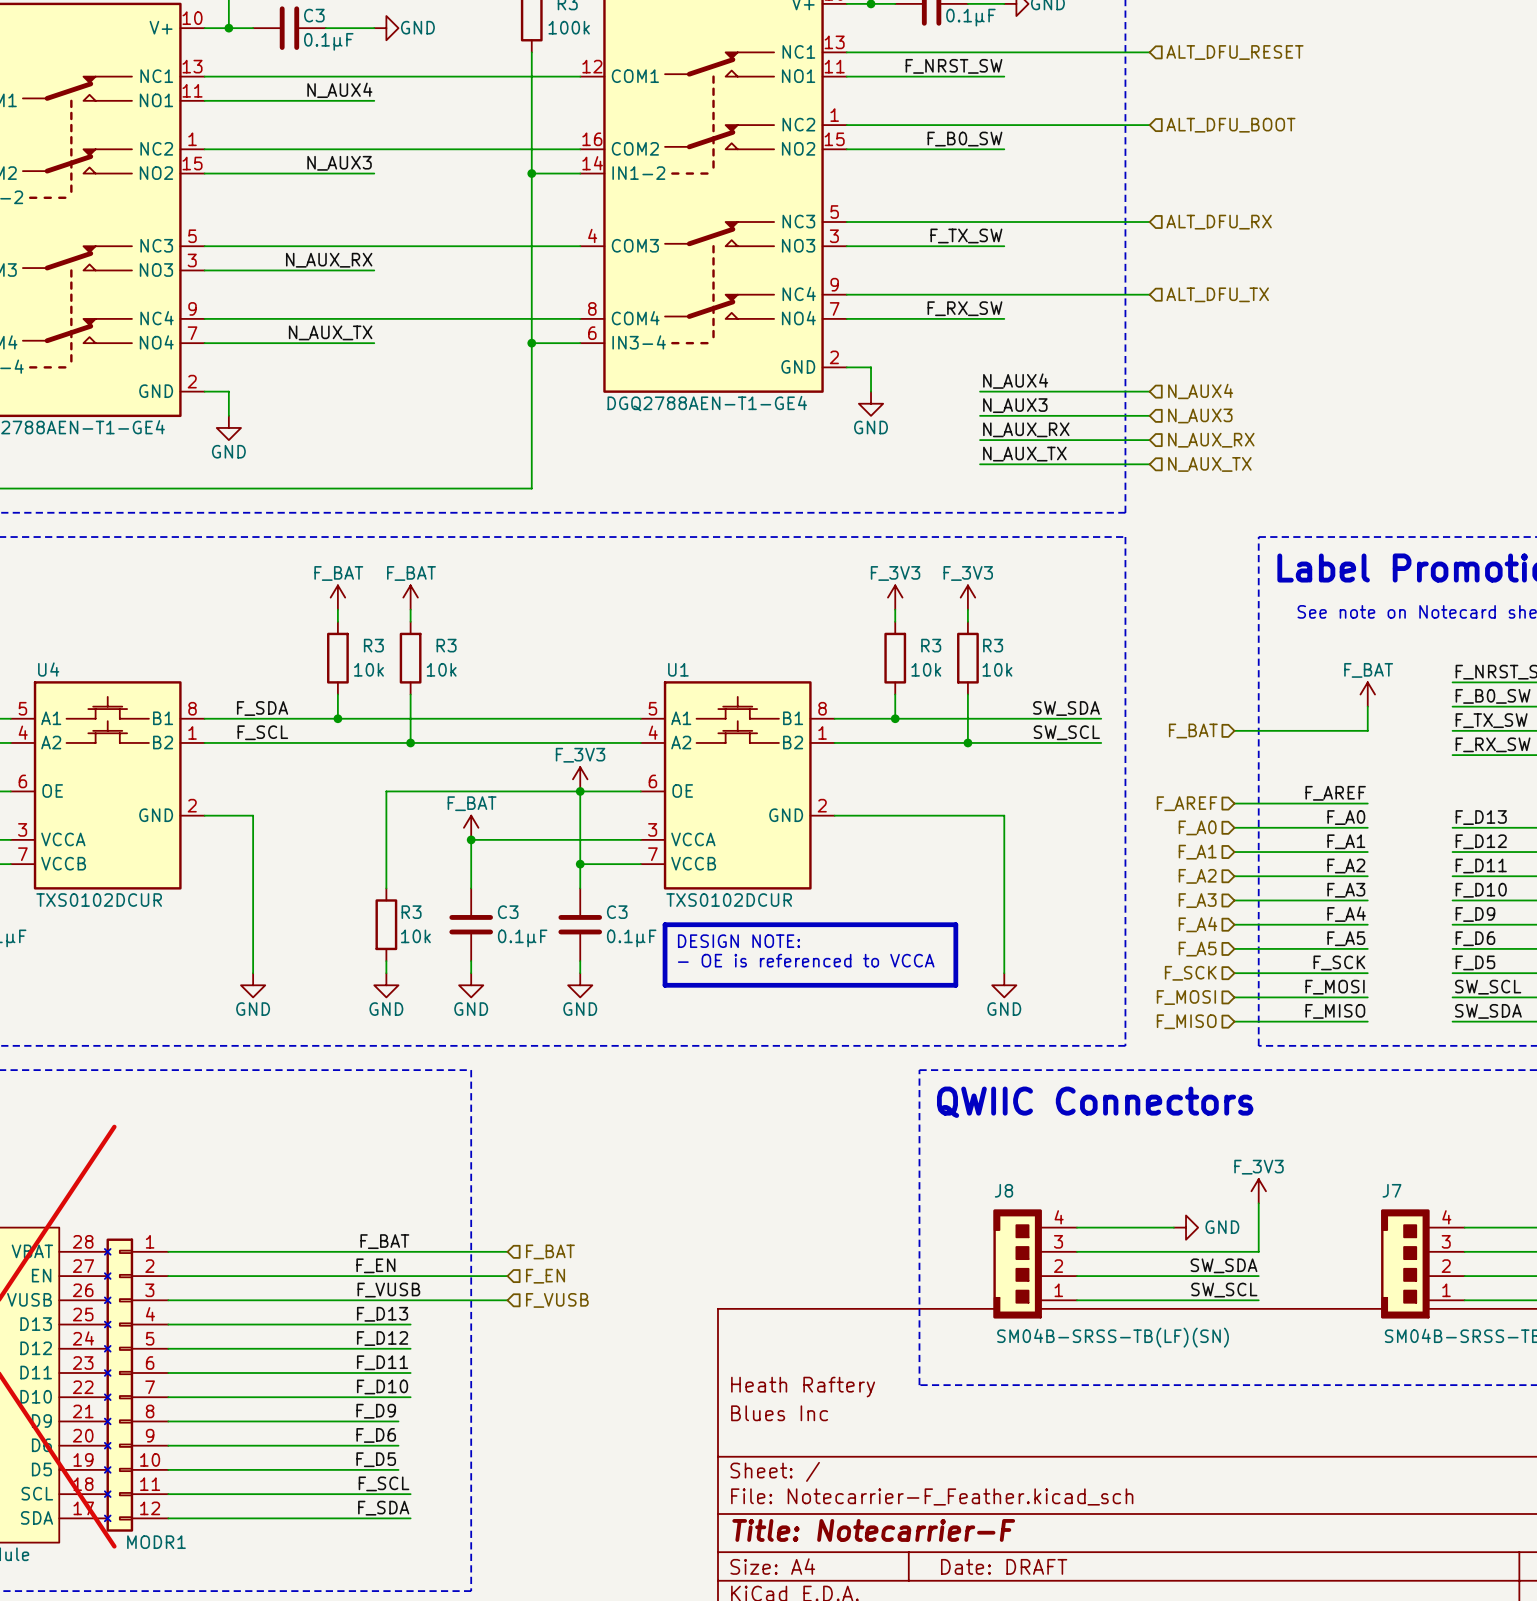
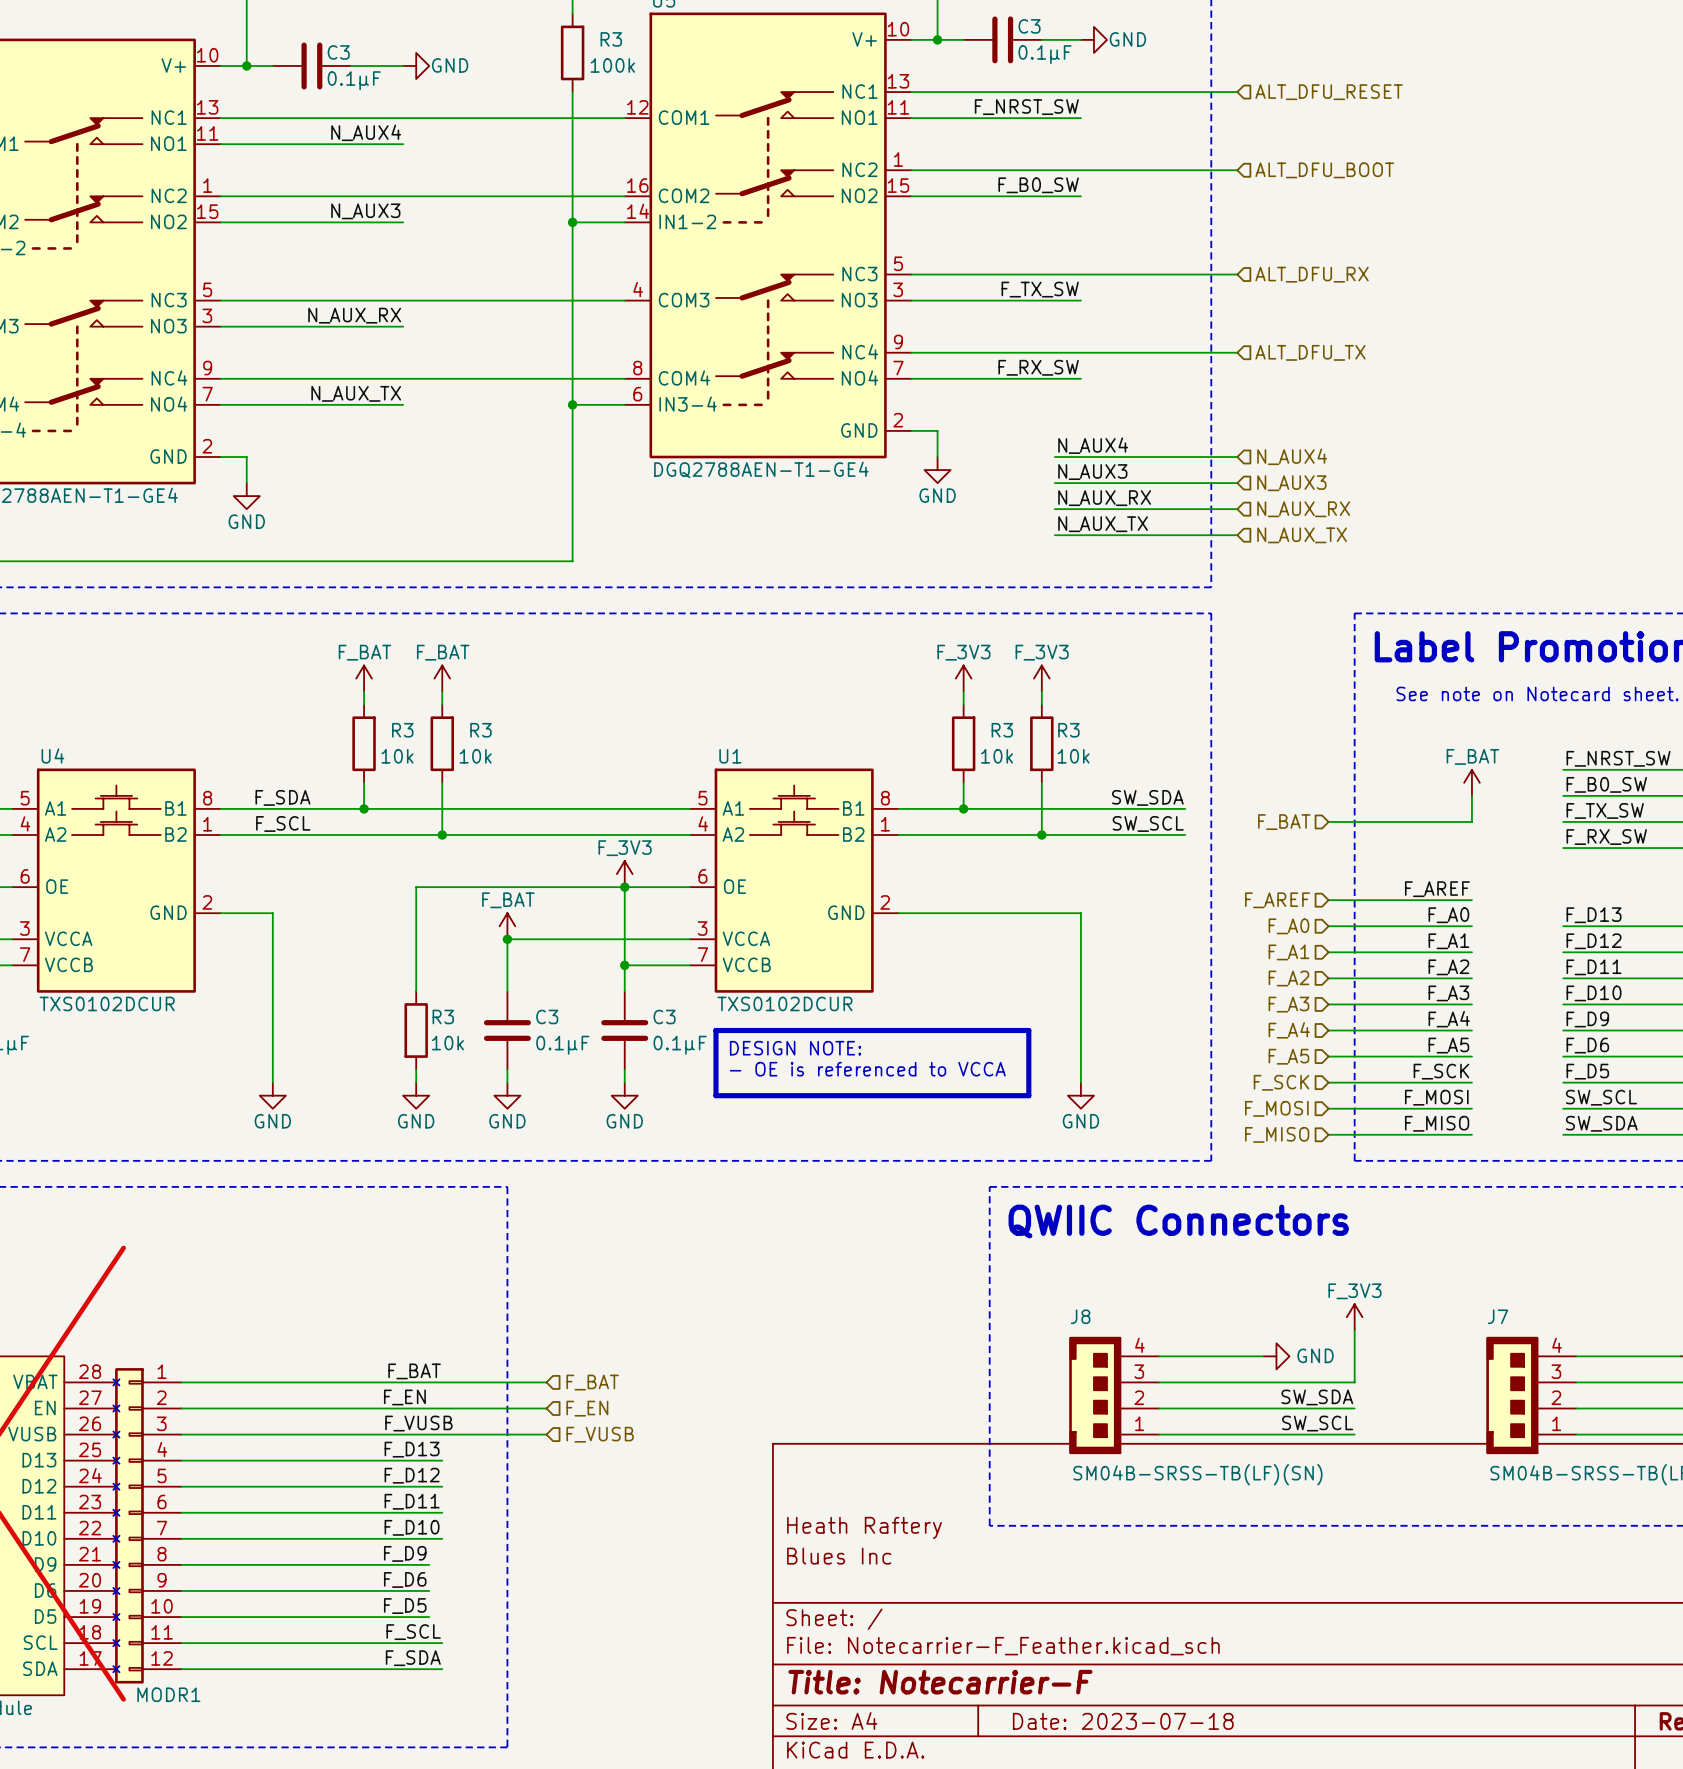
title block: Date: DRAFT (1004, 1566) -> Date: 2023-07-18 (1123, 1721)

